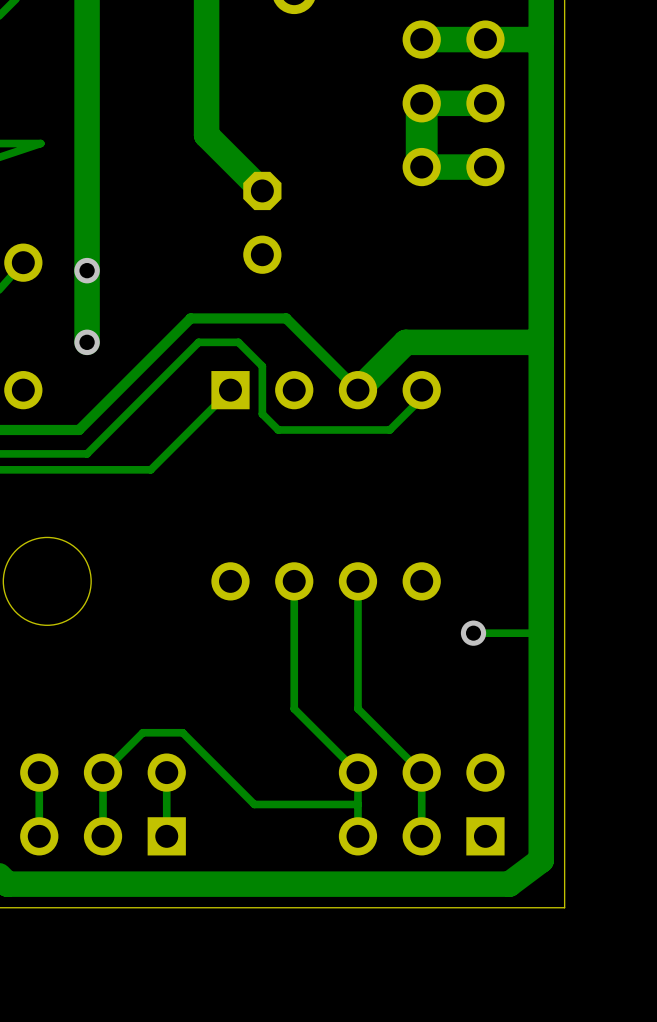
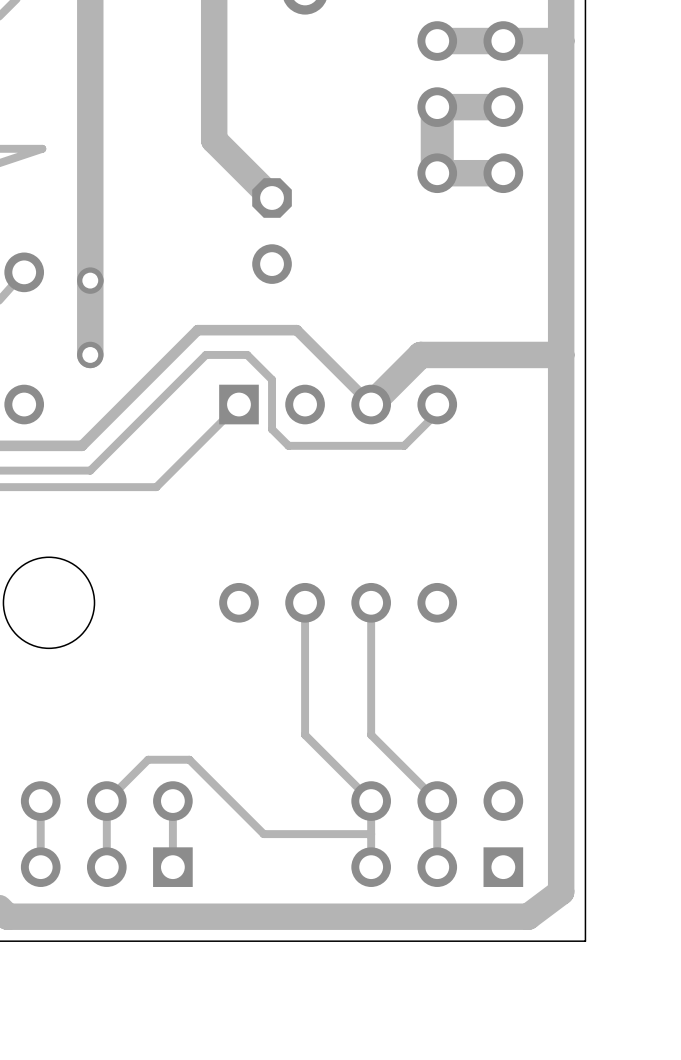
via: (473, 633) -> none
track: (541, 633) (473, 633) -> none

